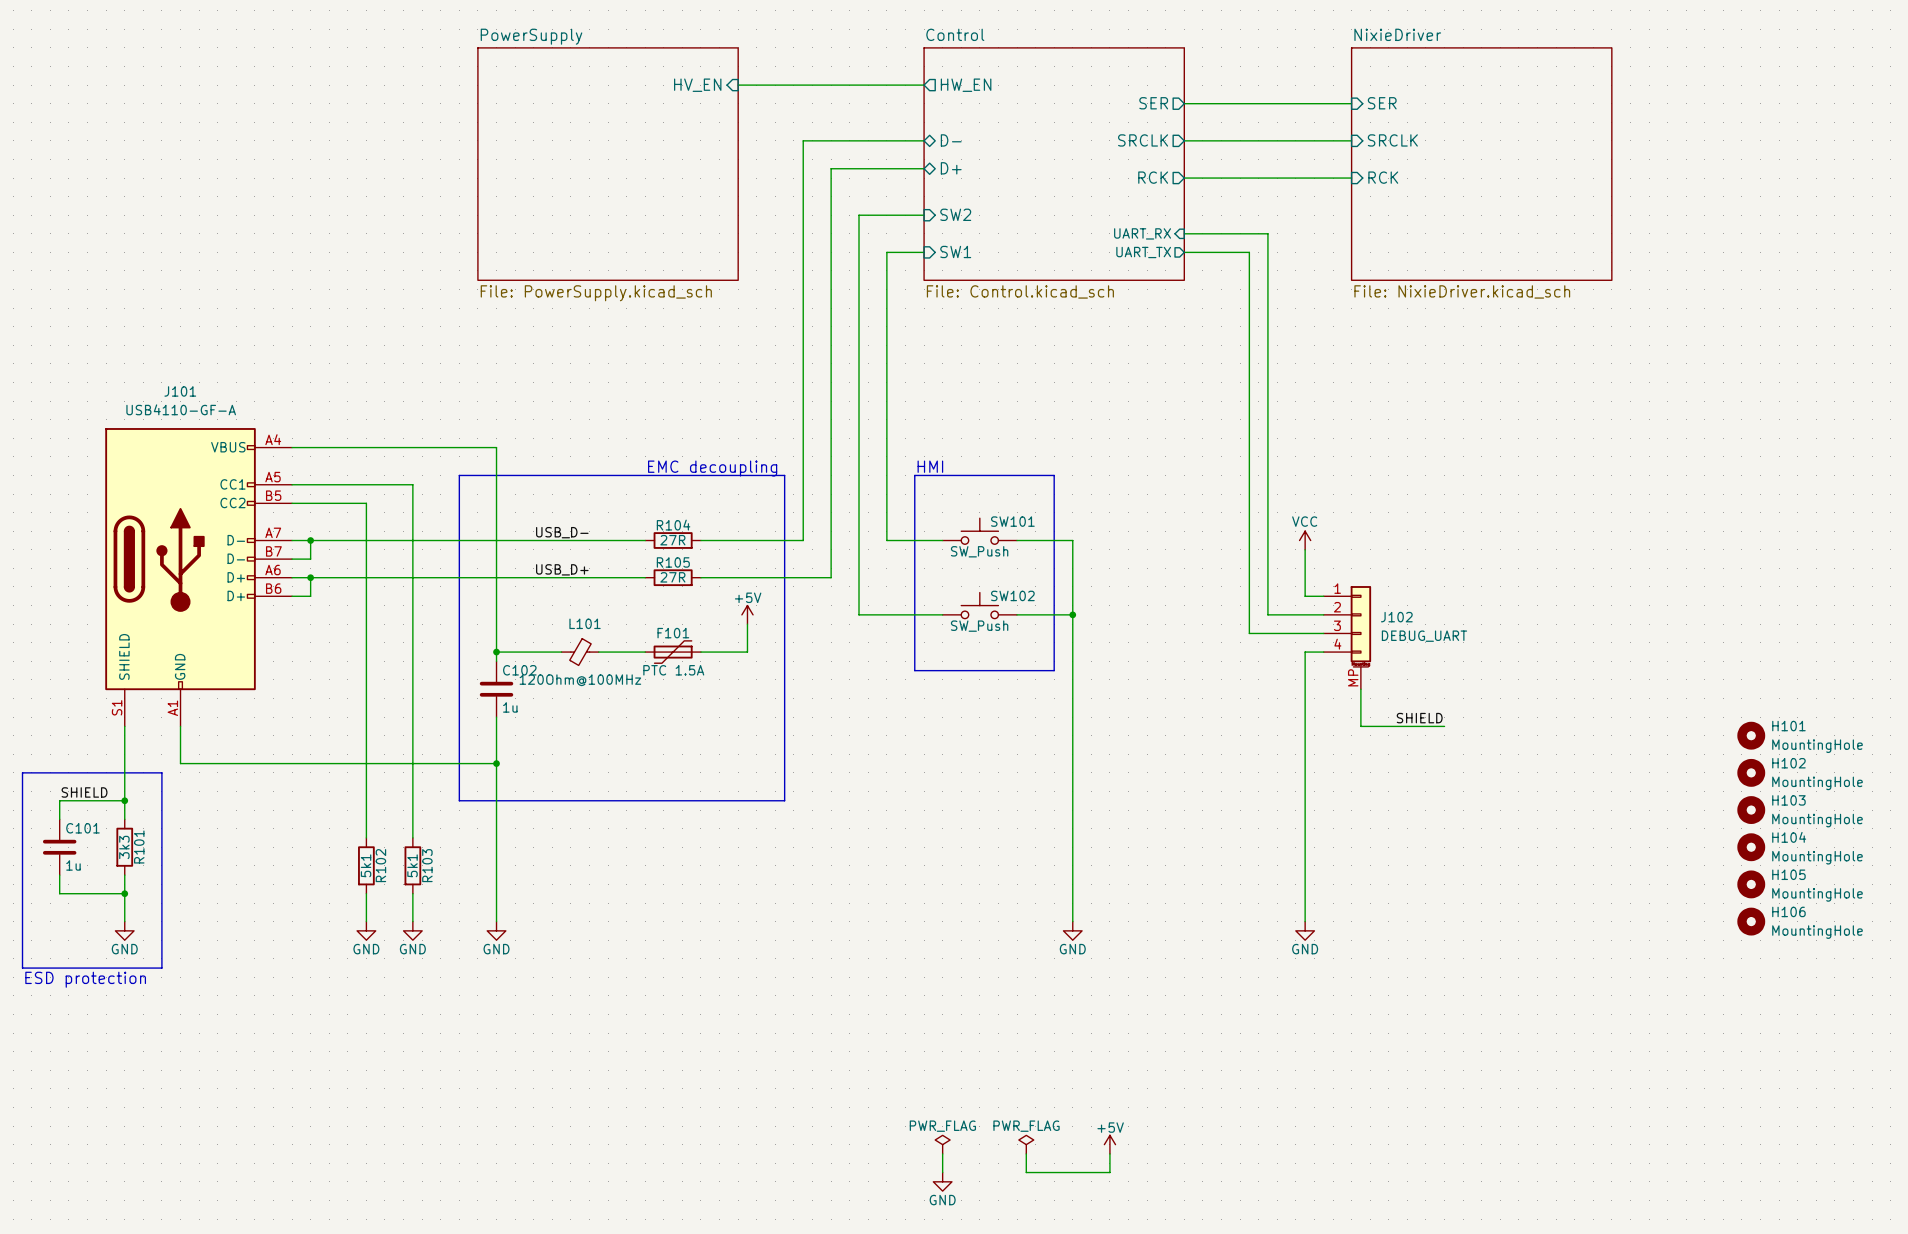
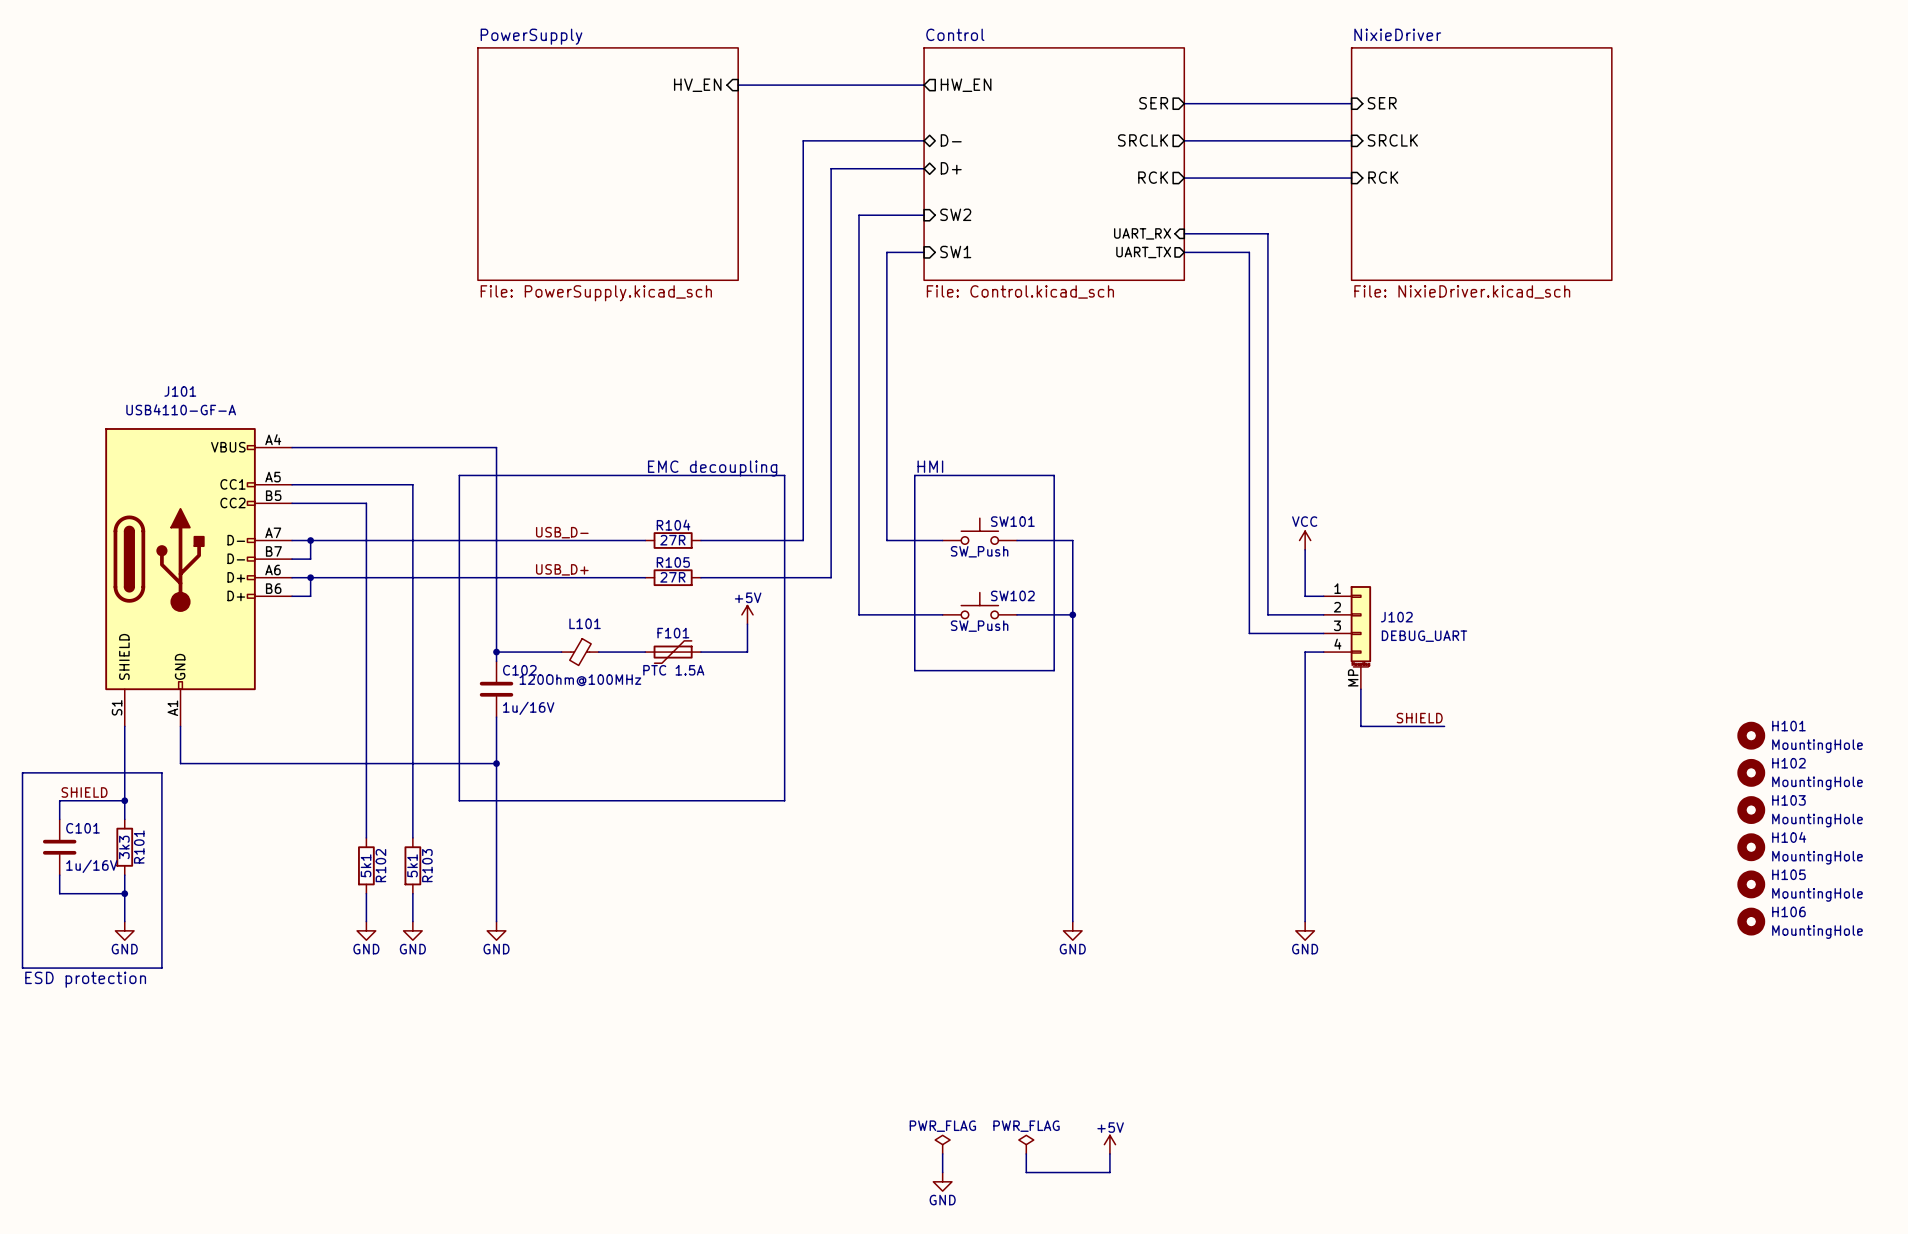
C102 value: 1u (510, 707) -> 1u/16V (528, 708)
C101 value: 1u (73, 865) -> 1u/16V (91, 866)

